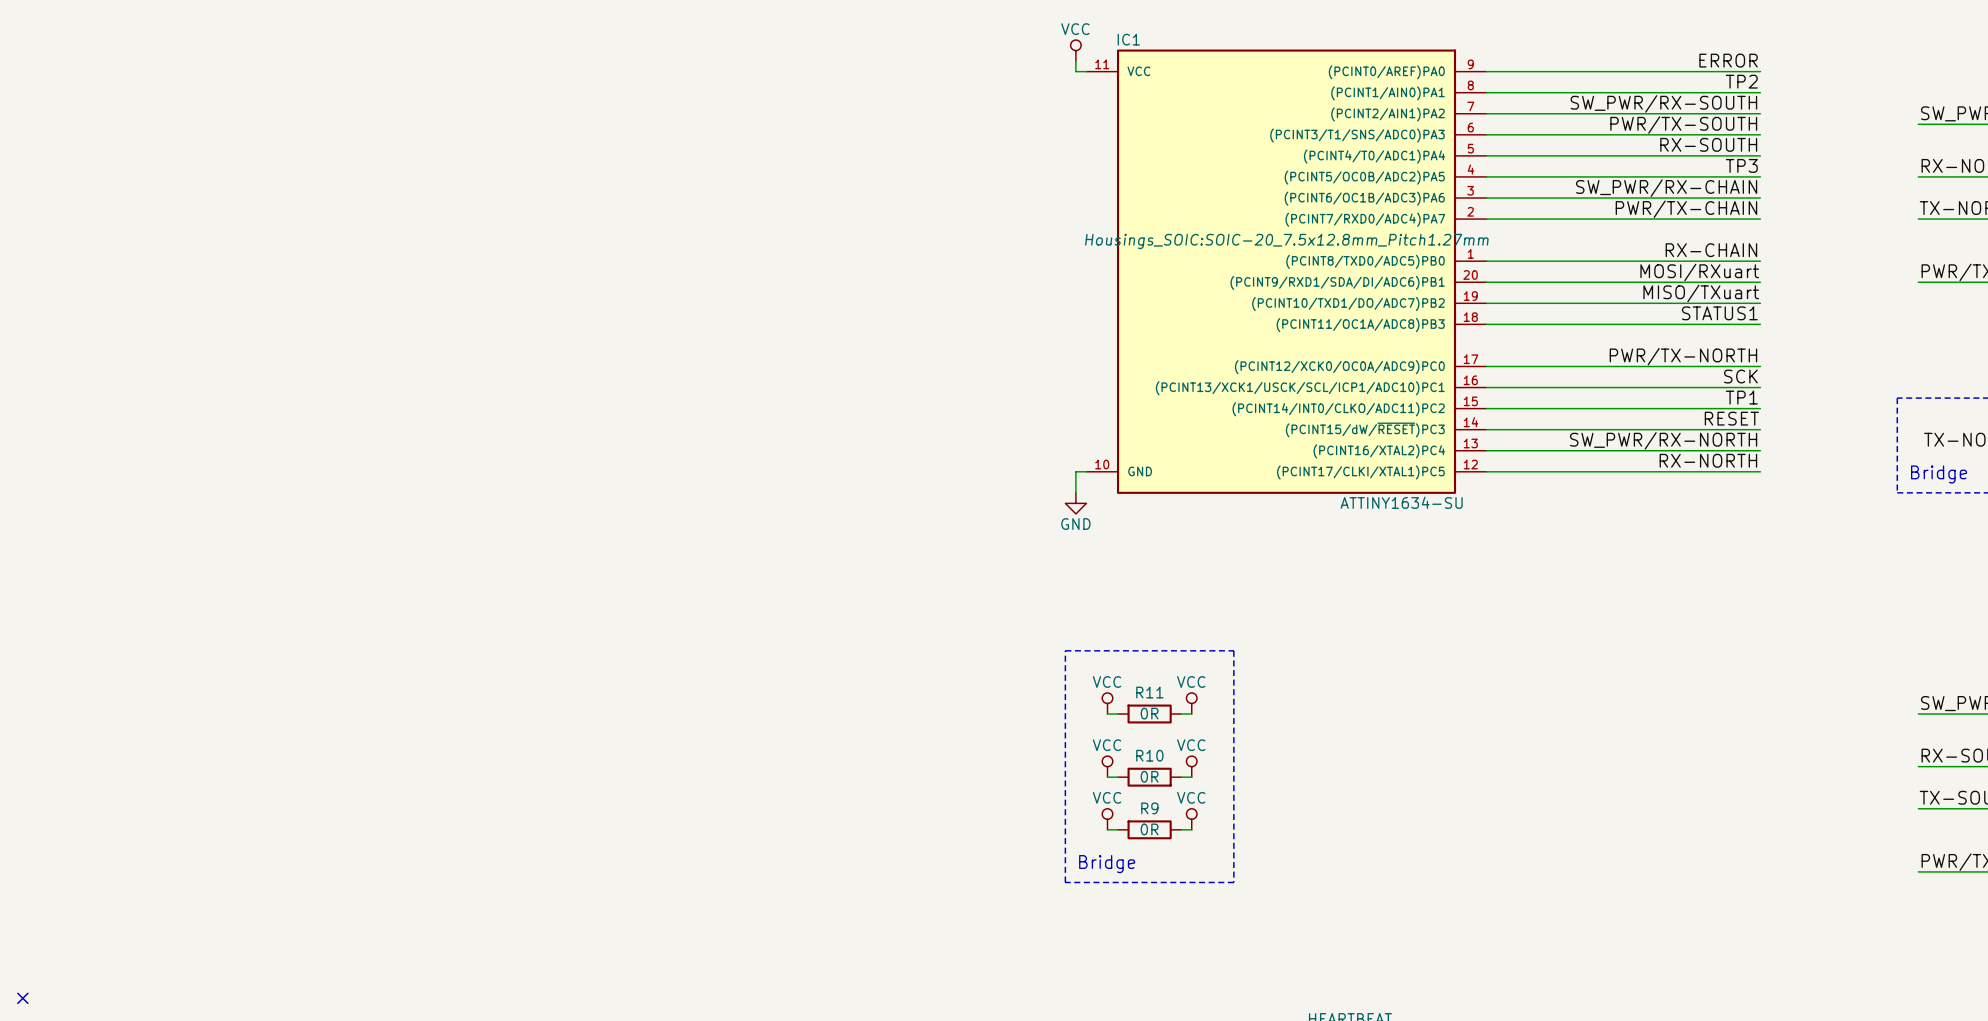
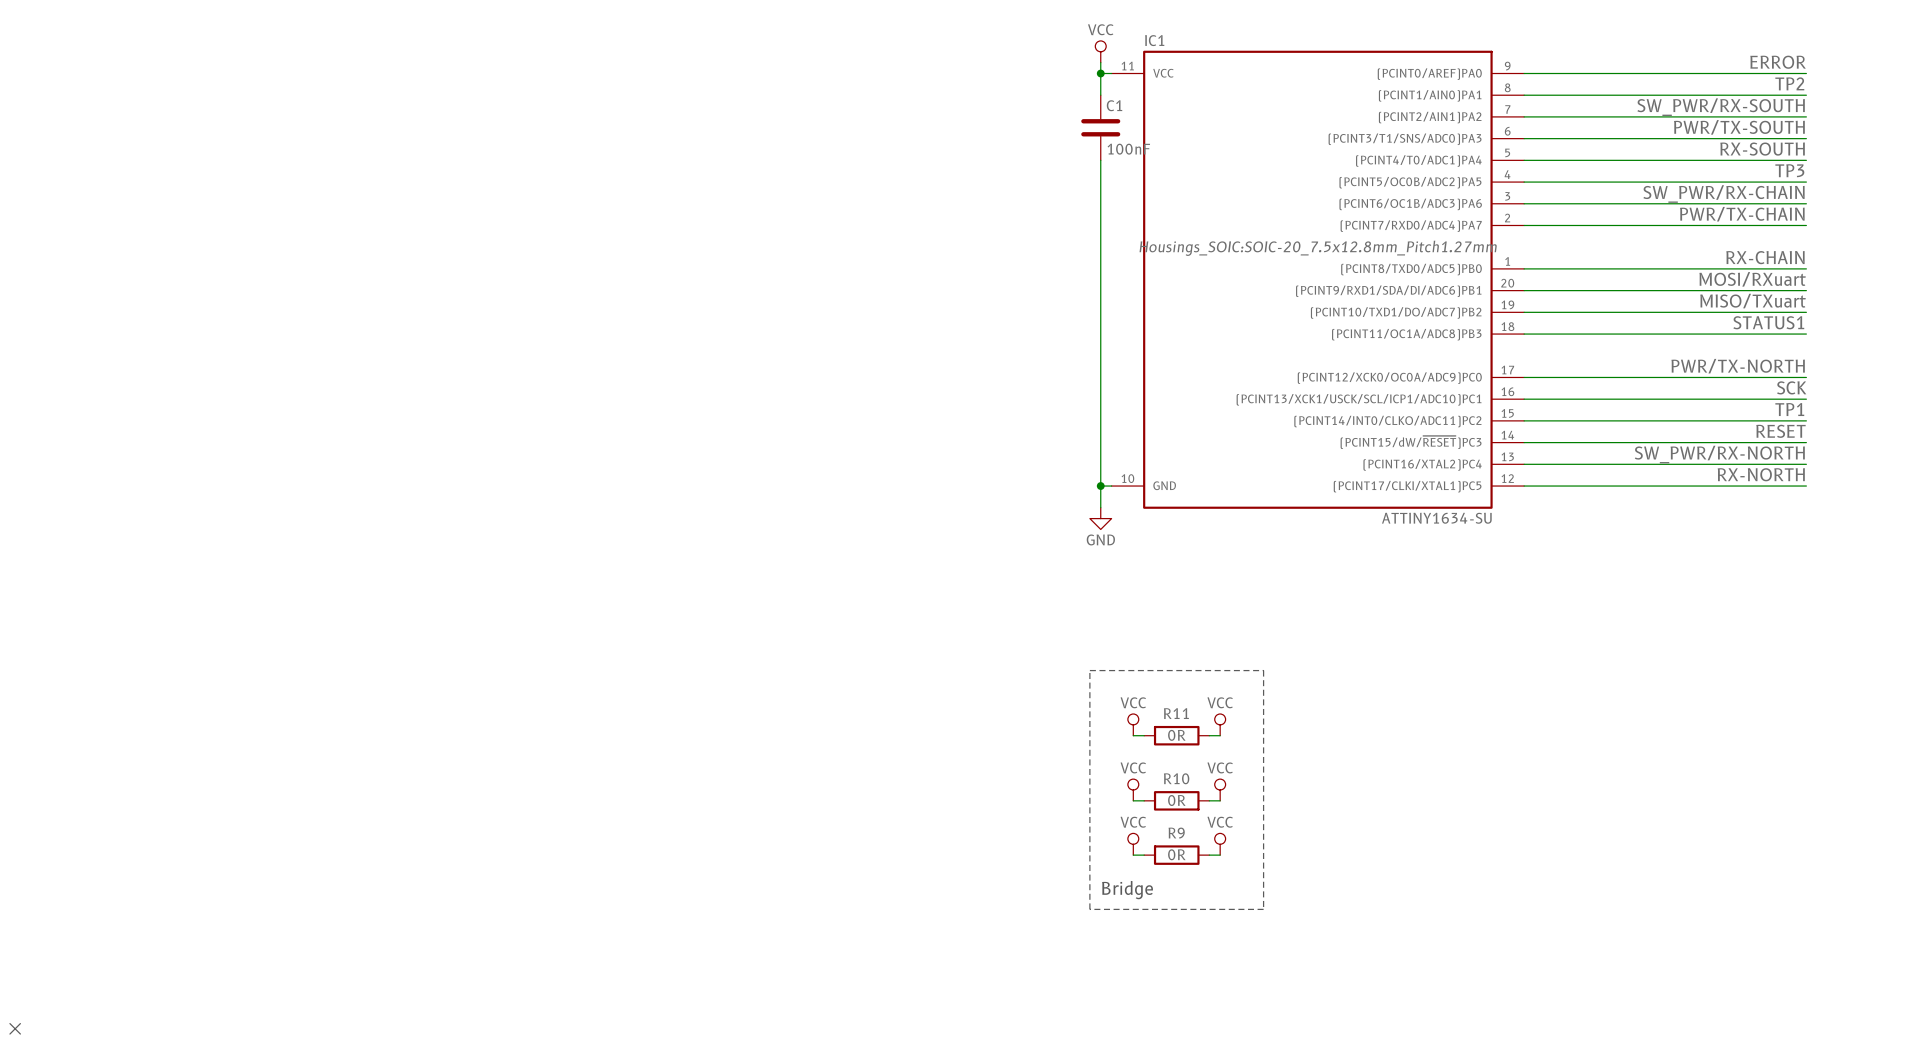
wire: none -> (1100, 73) (1100, 95)
junction: none -> (1100, 73)
C1: none -> 100nF (1100, 127)
wire: none -> (1100, 160) (1100, 486)
junction: none -> (1100, 486)

